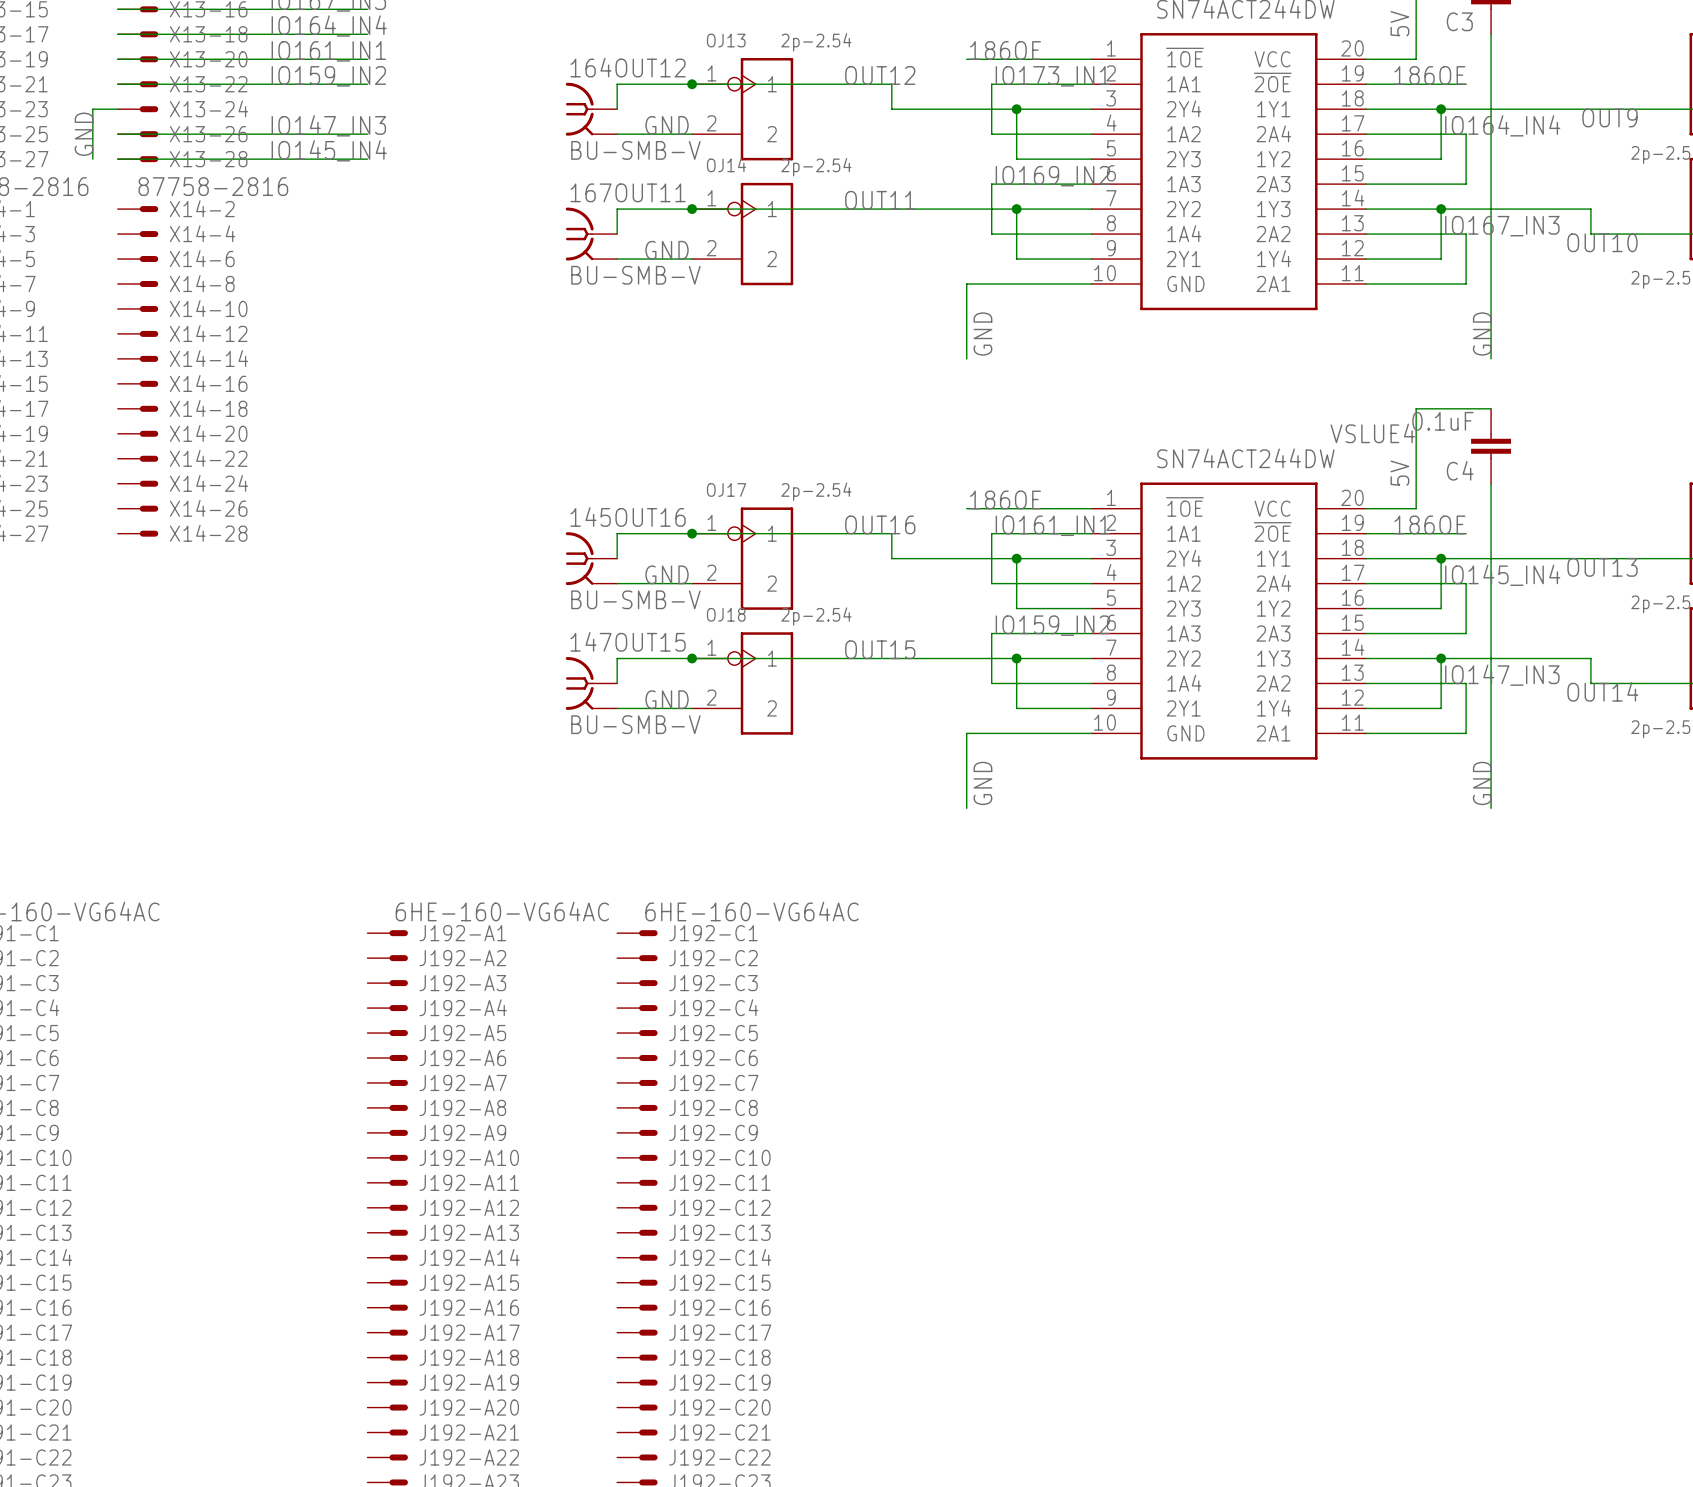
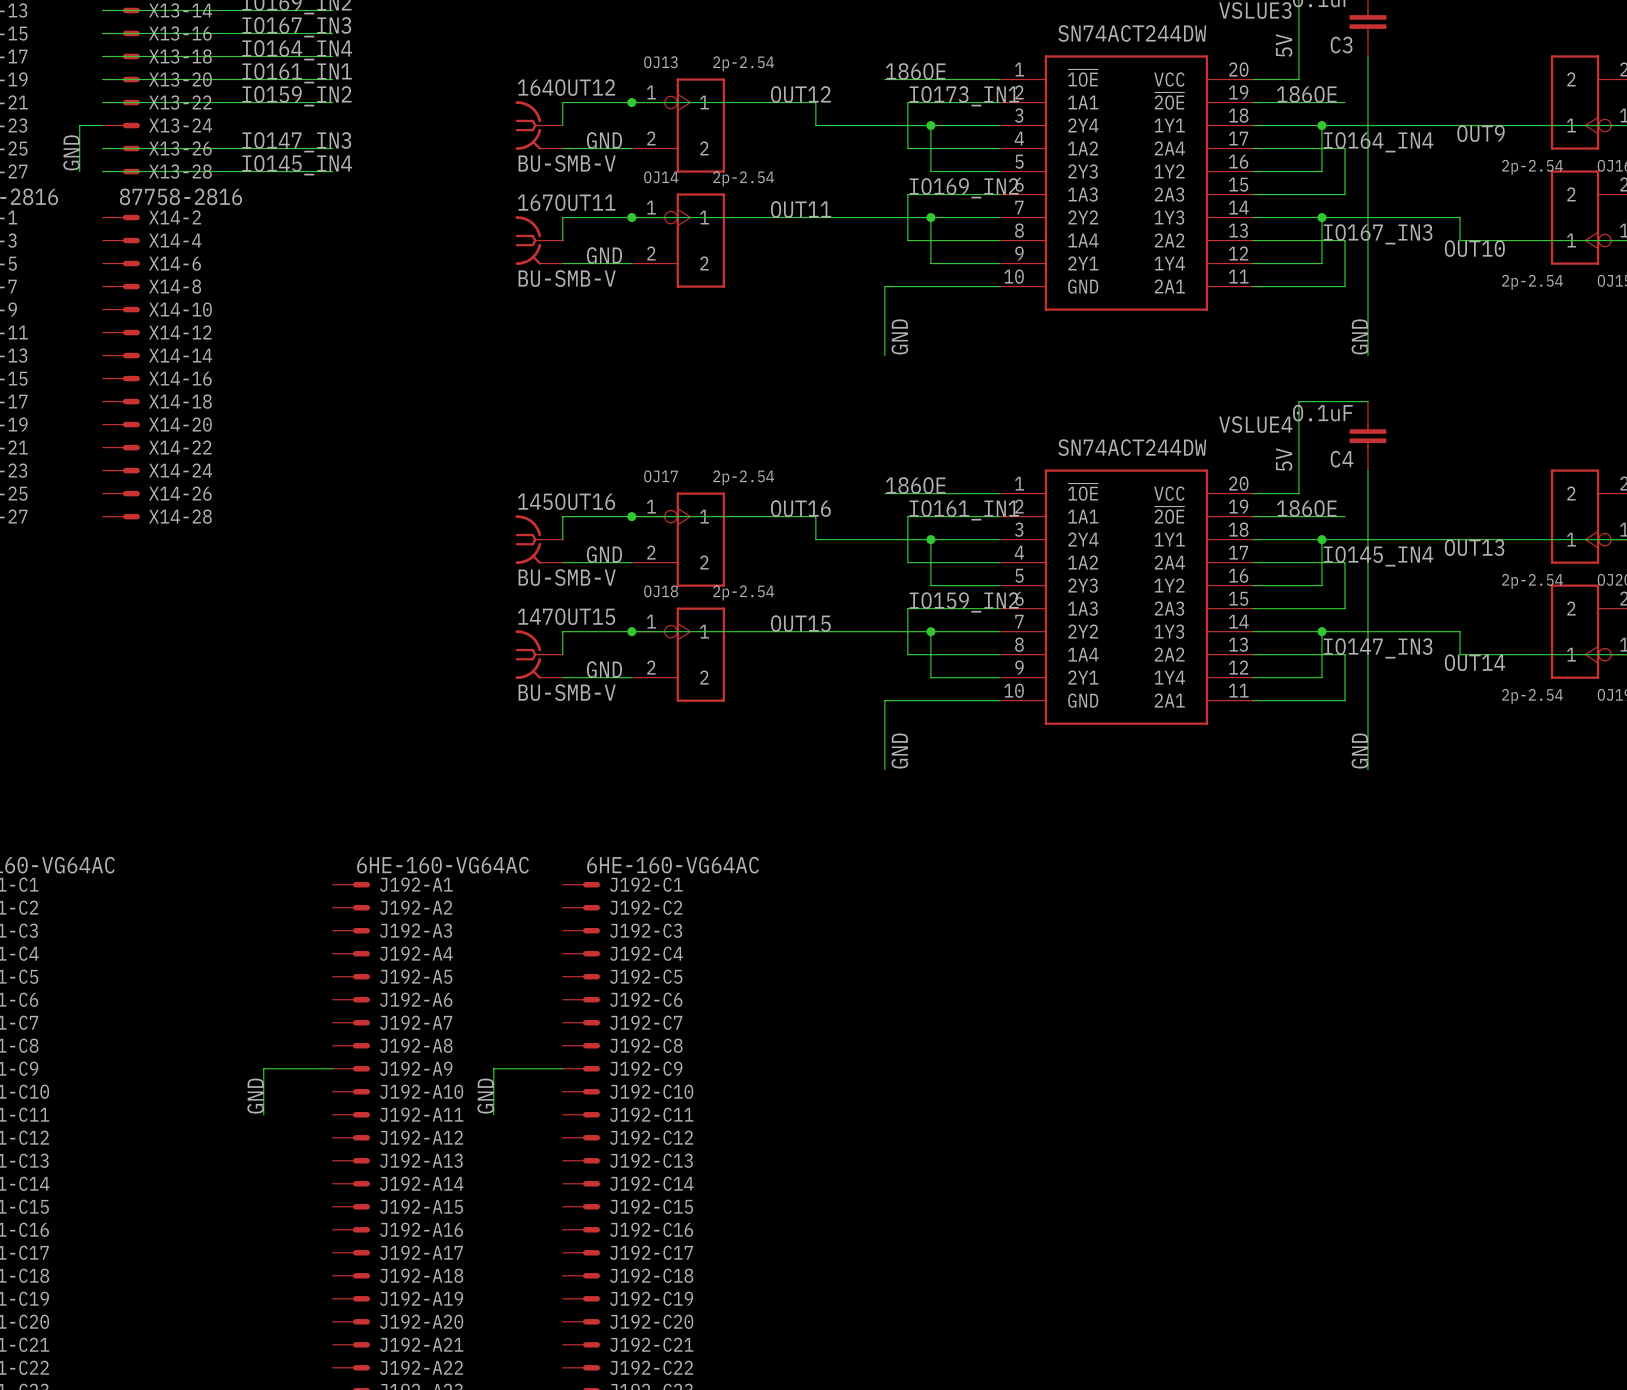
wire: none -> (332, 1068) (263, 1068) (263, 1114)
wire: none -> (562, 1068) (493, 1068) (493, 1114)
label: none -> GND (255, 1096)
label: none -> GND (485, 1096)

